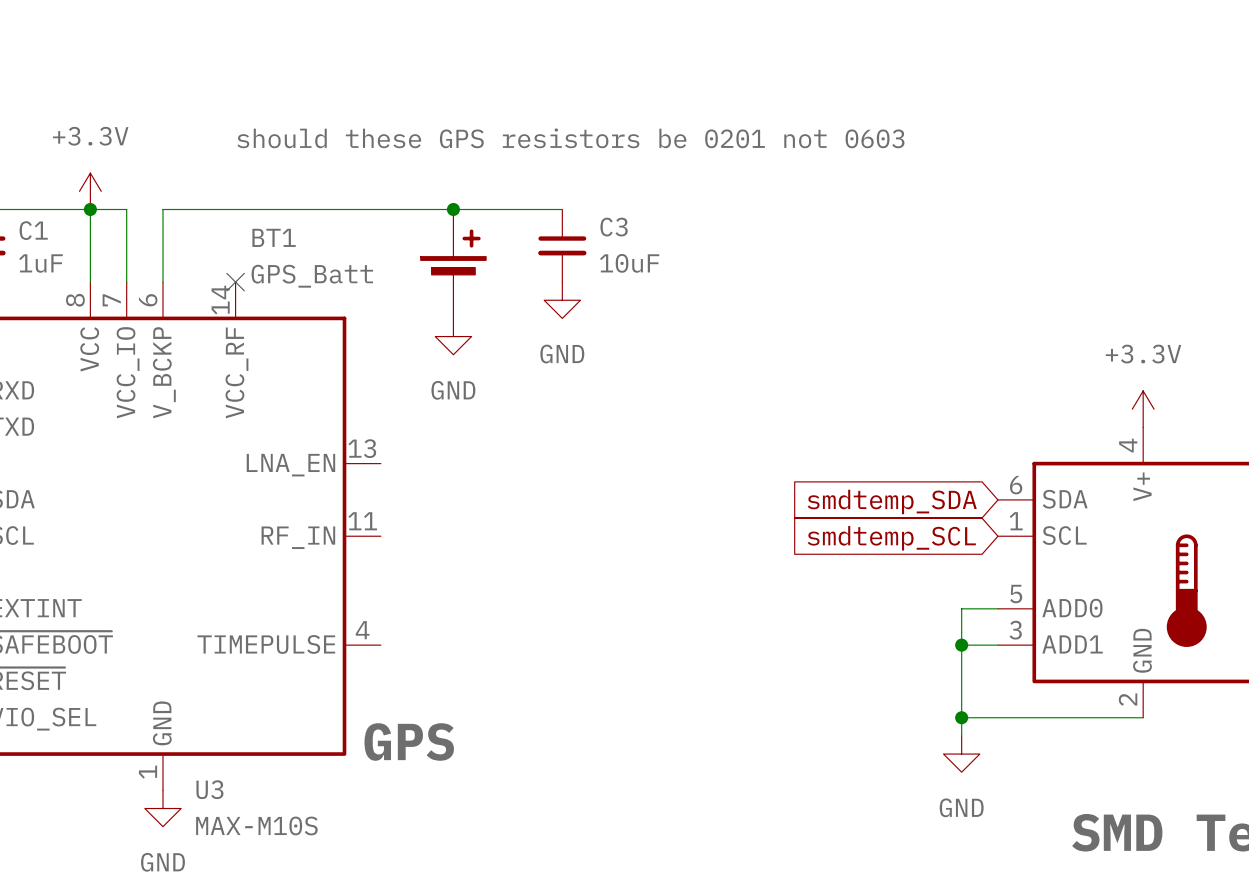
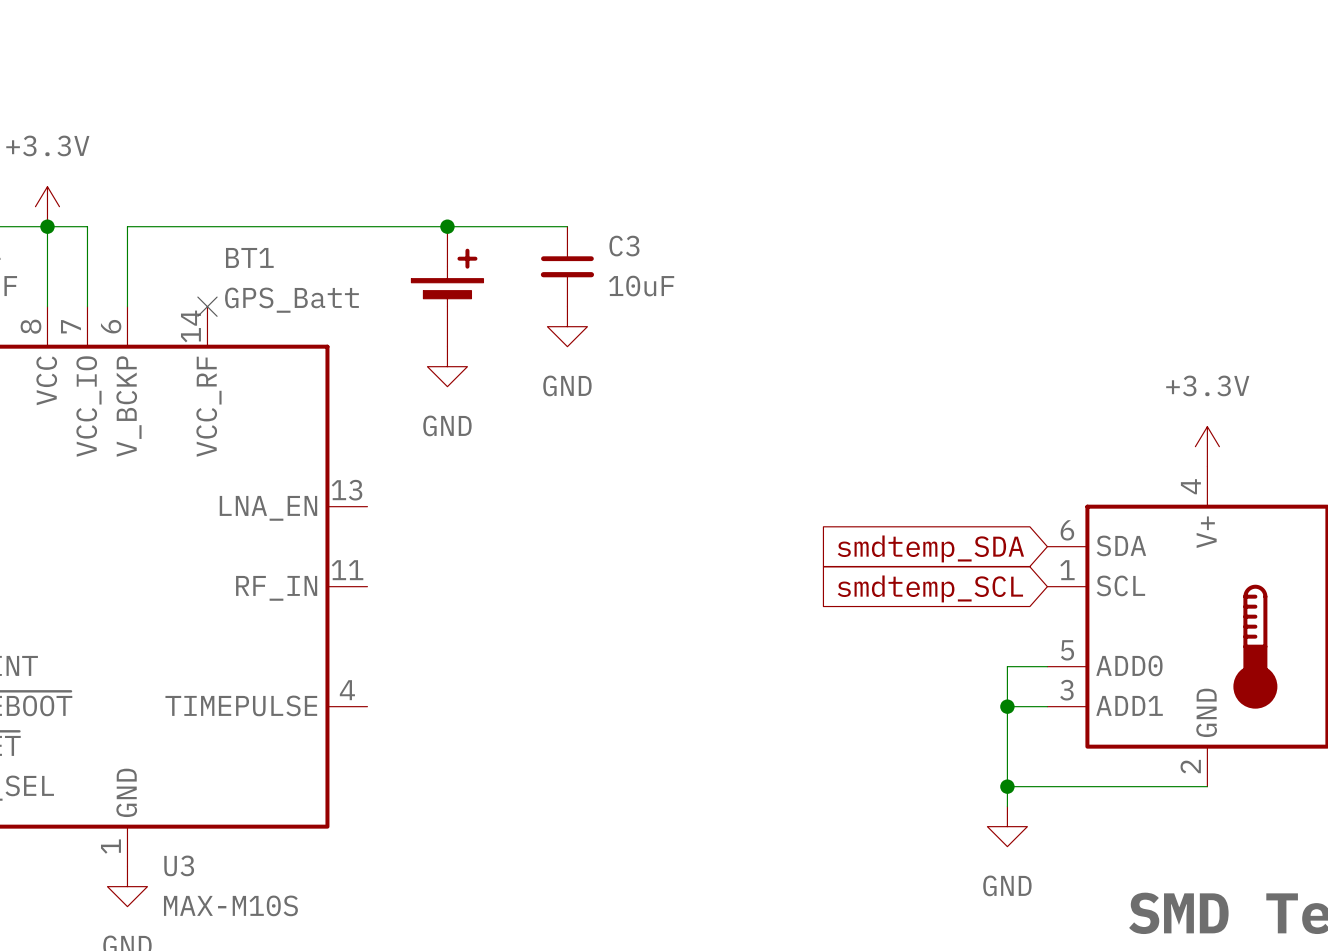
label: should these GPS resistors be 0201 not 0603 (570, 138) -> none
label: GPS (409, 741) -> none

